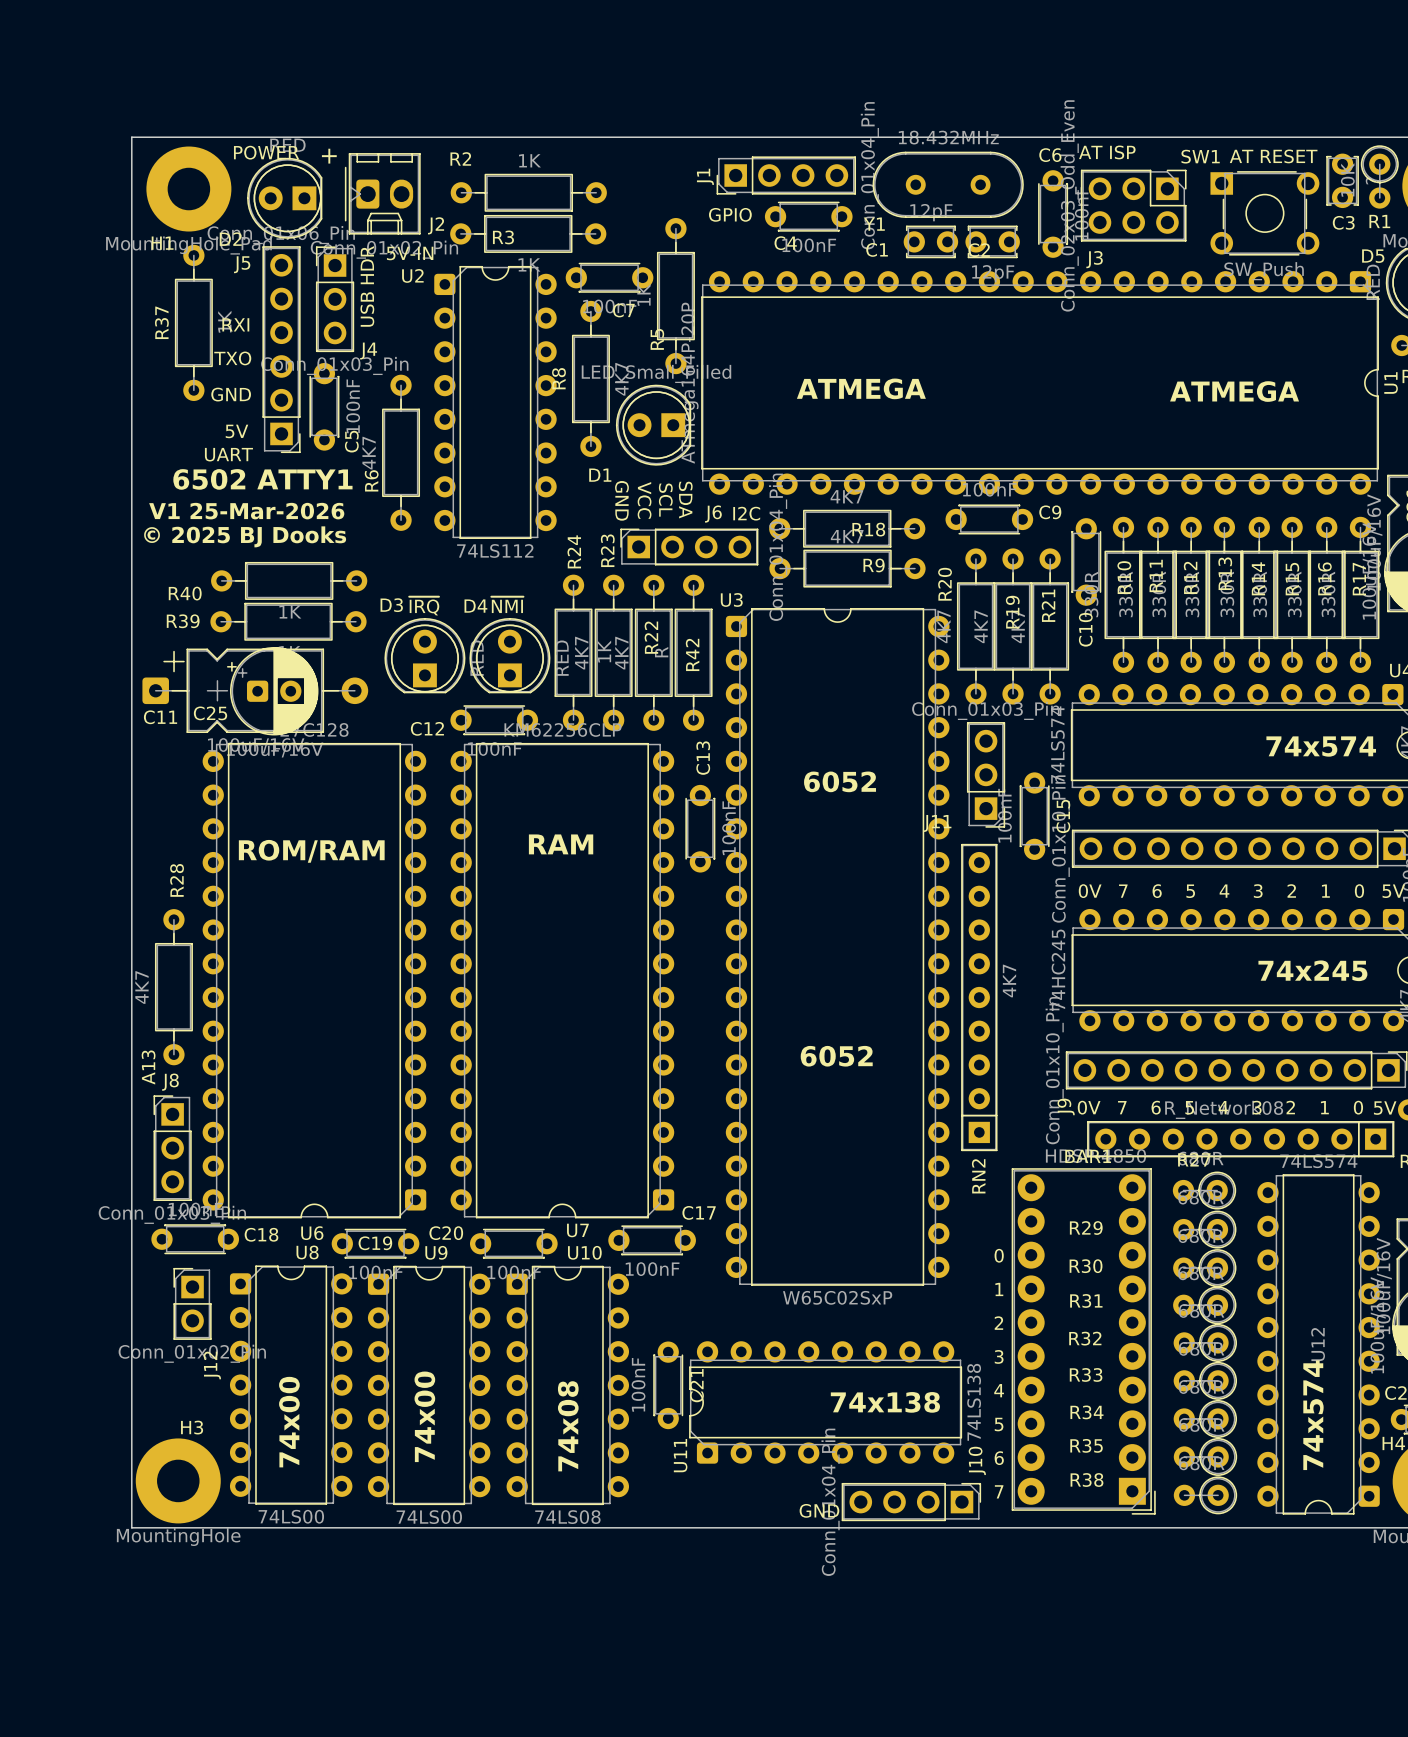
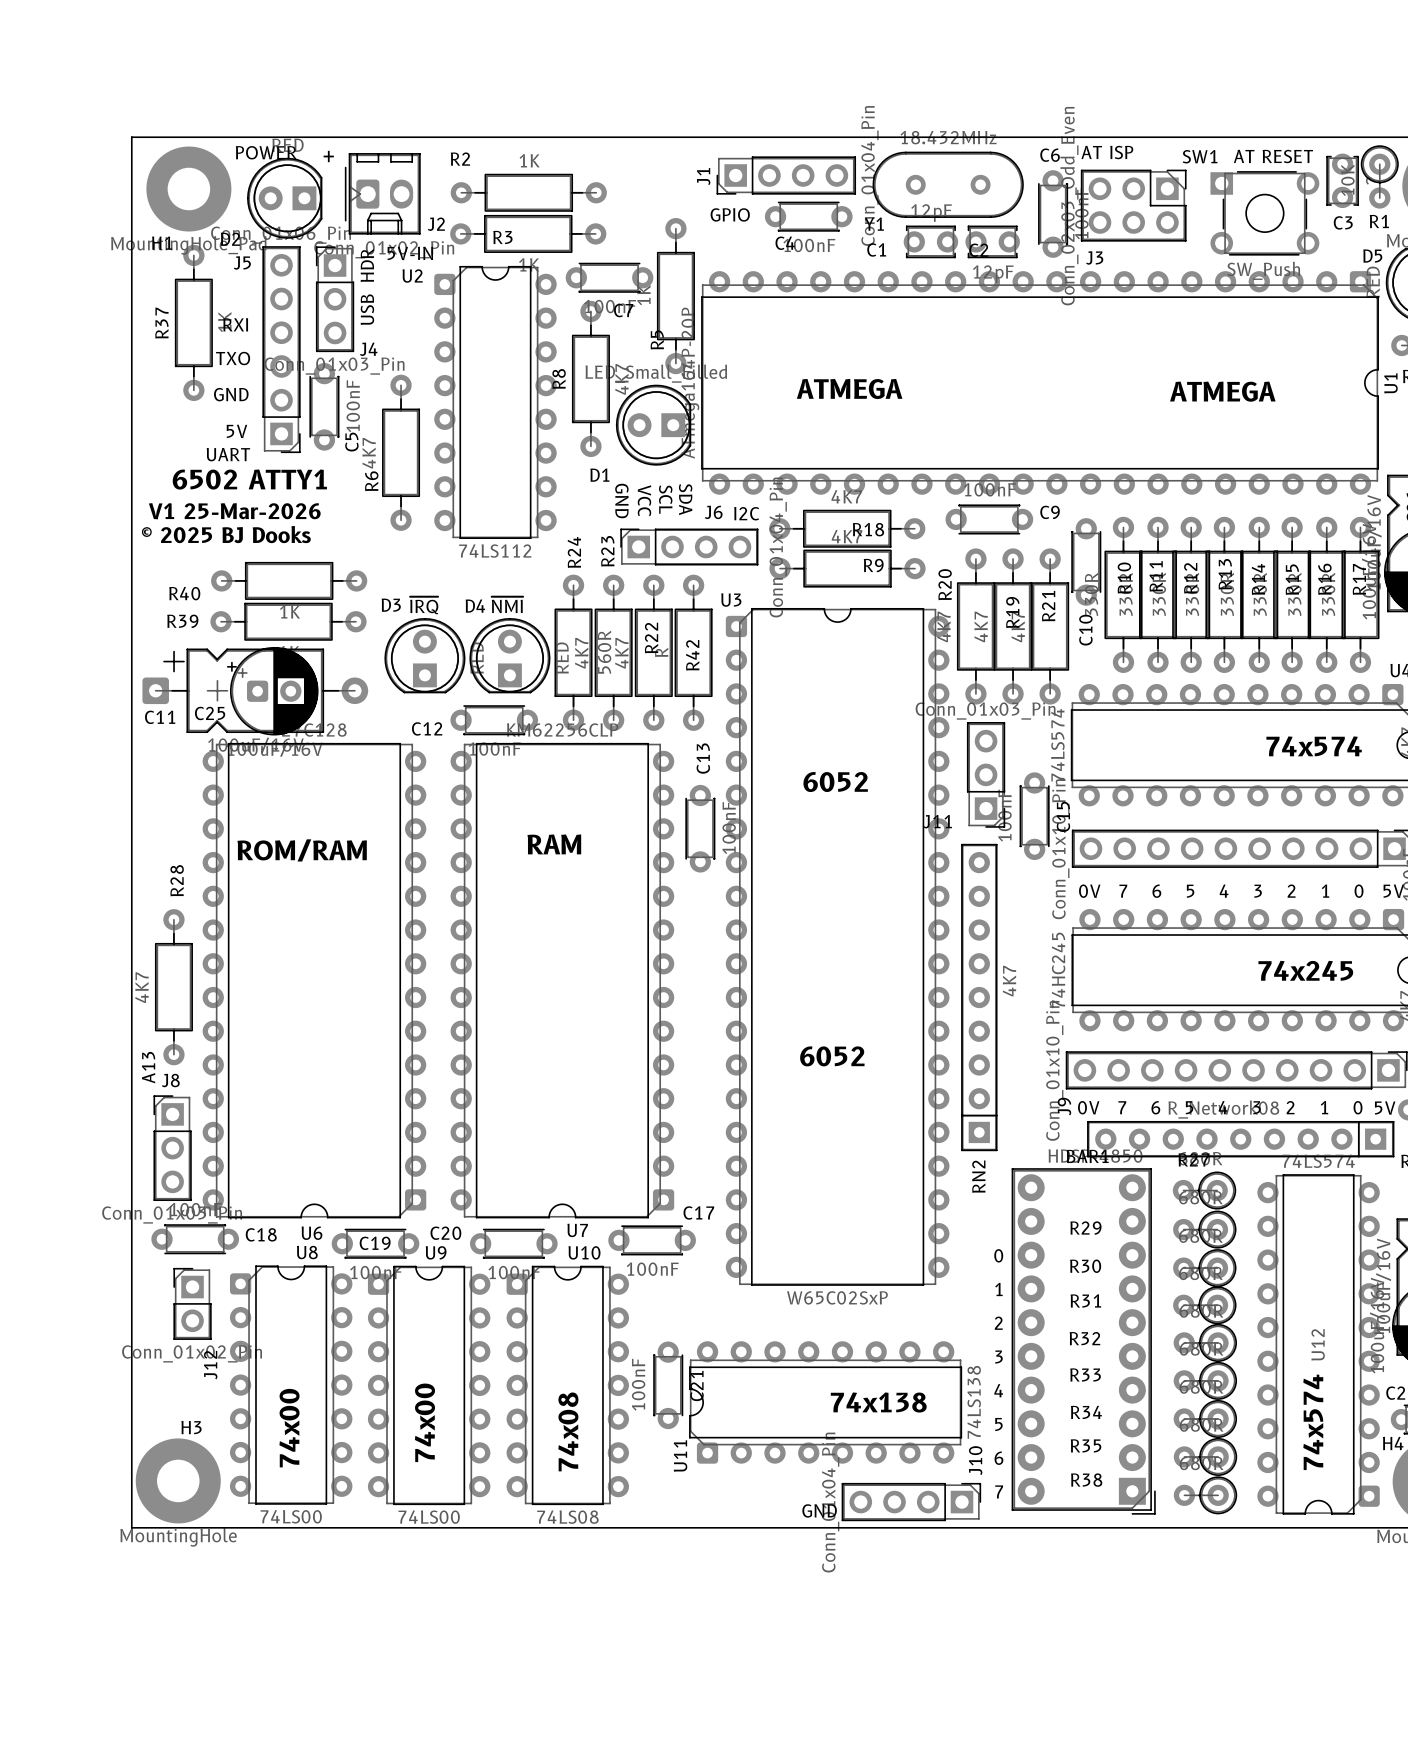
R24 value: 1K (604, 651) -> 560R (604, 652)

